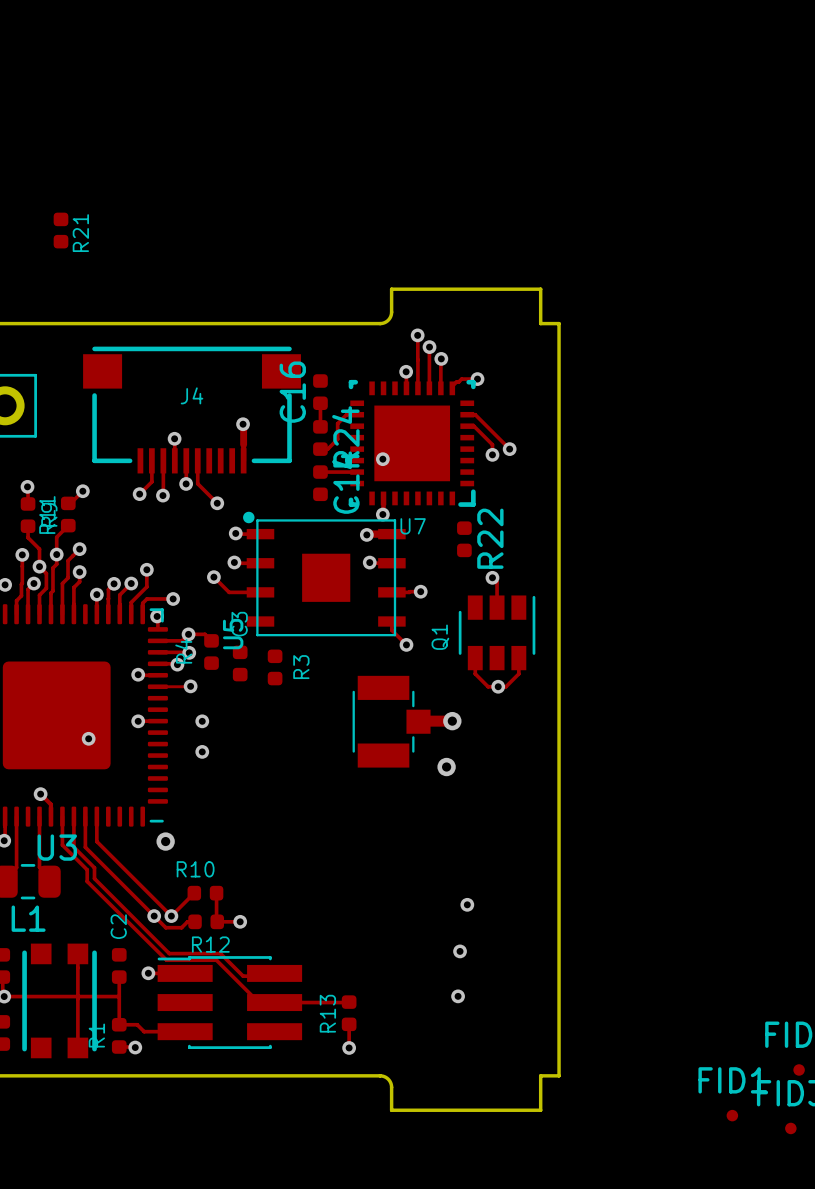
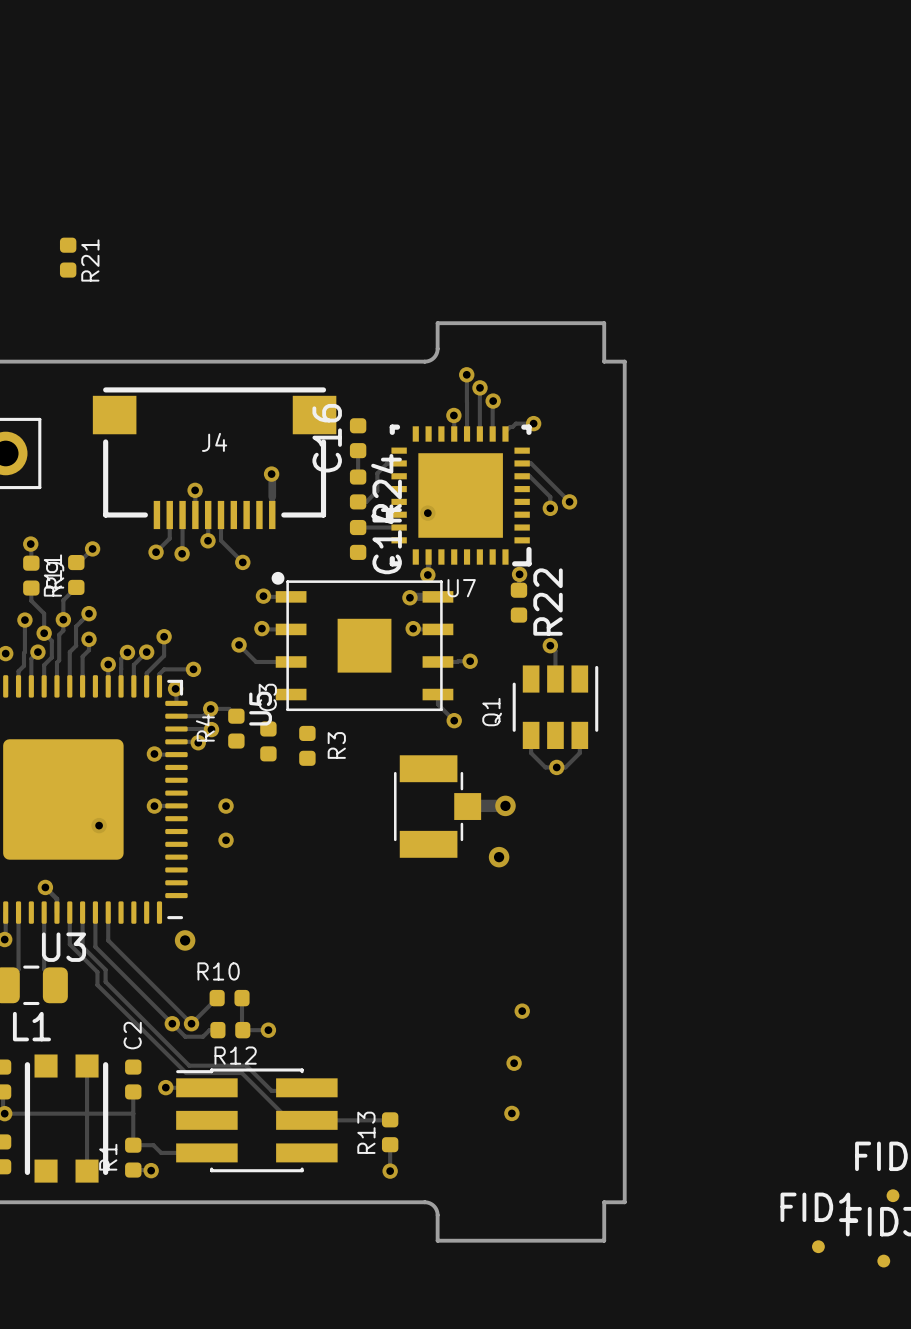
via: none -> (519, 574)
track: (190, 686) (157, 686) -> none
via: (190, 686) -> none

